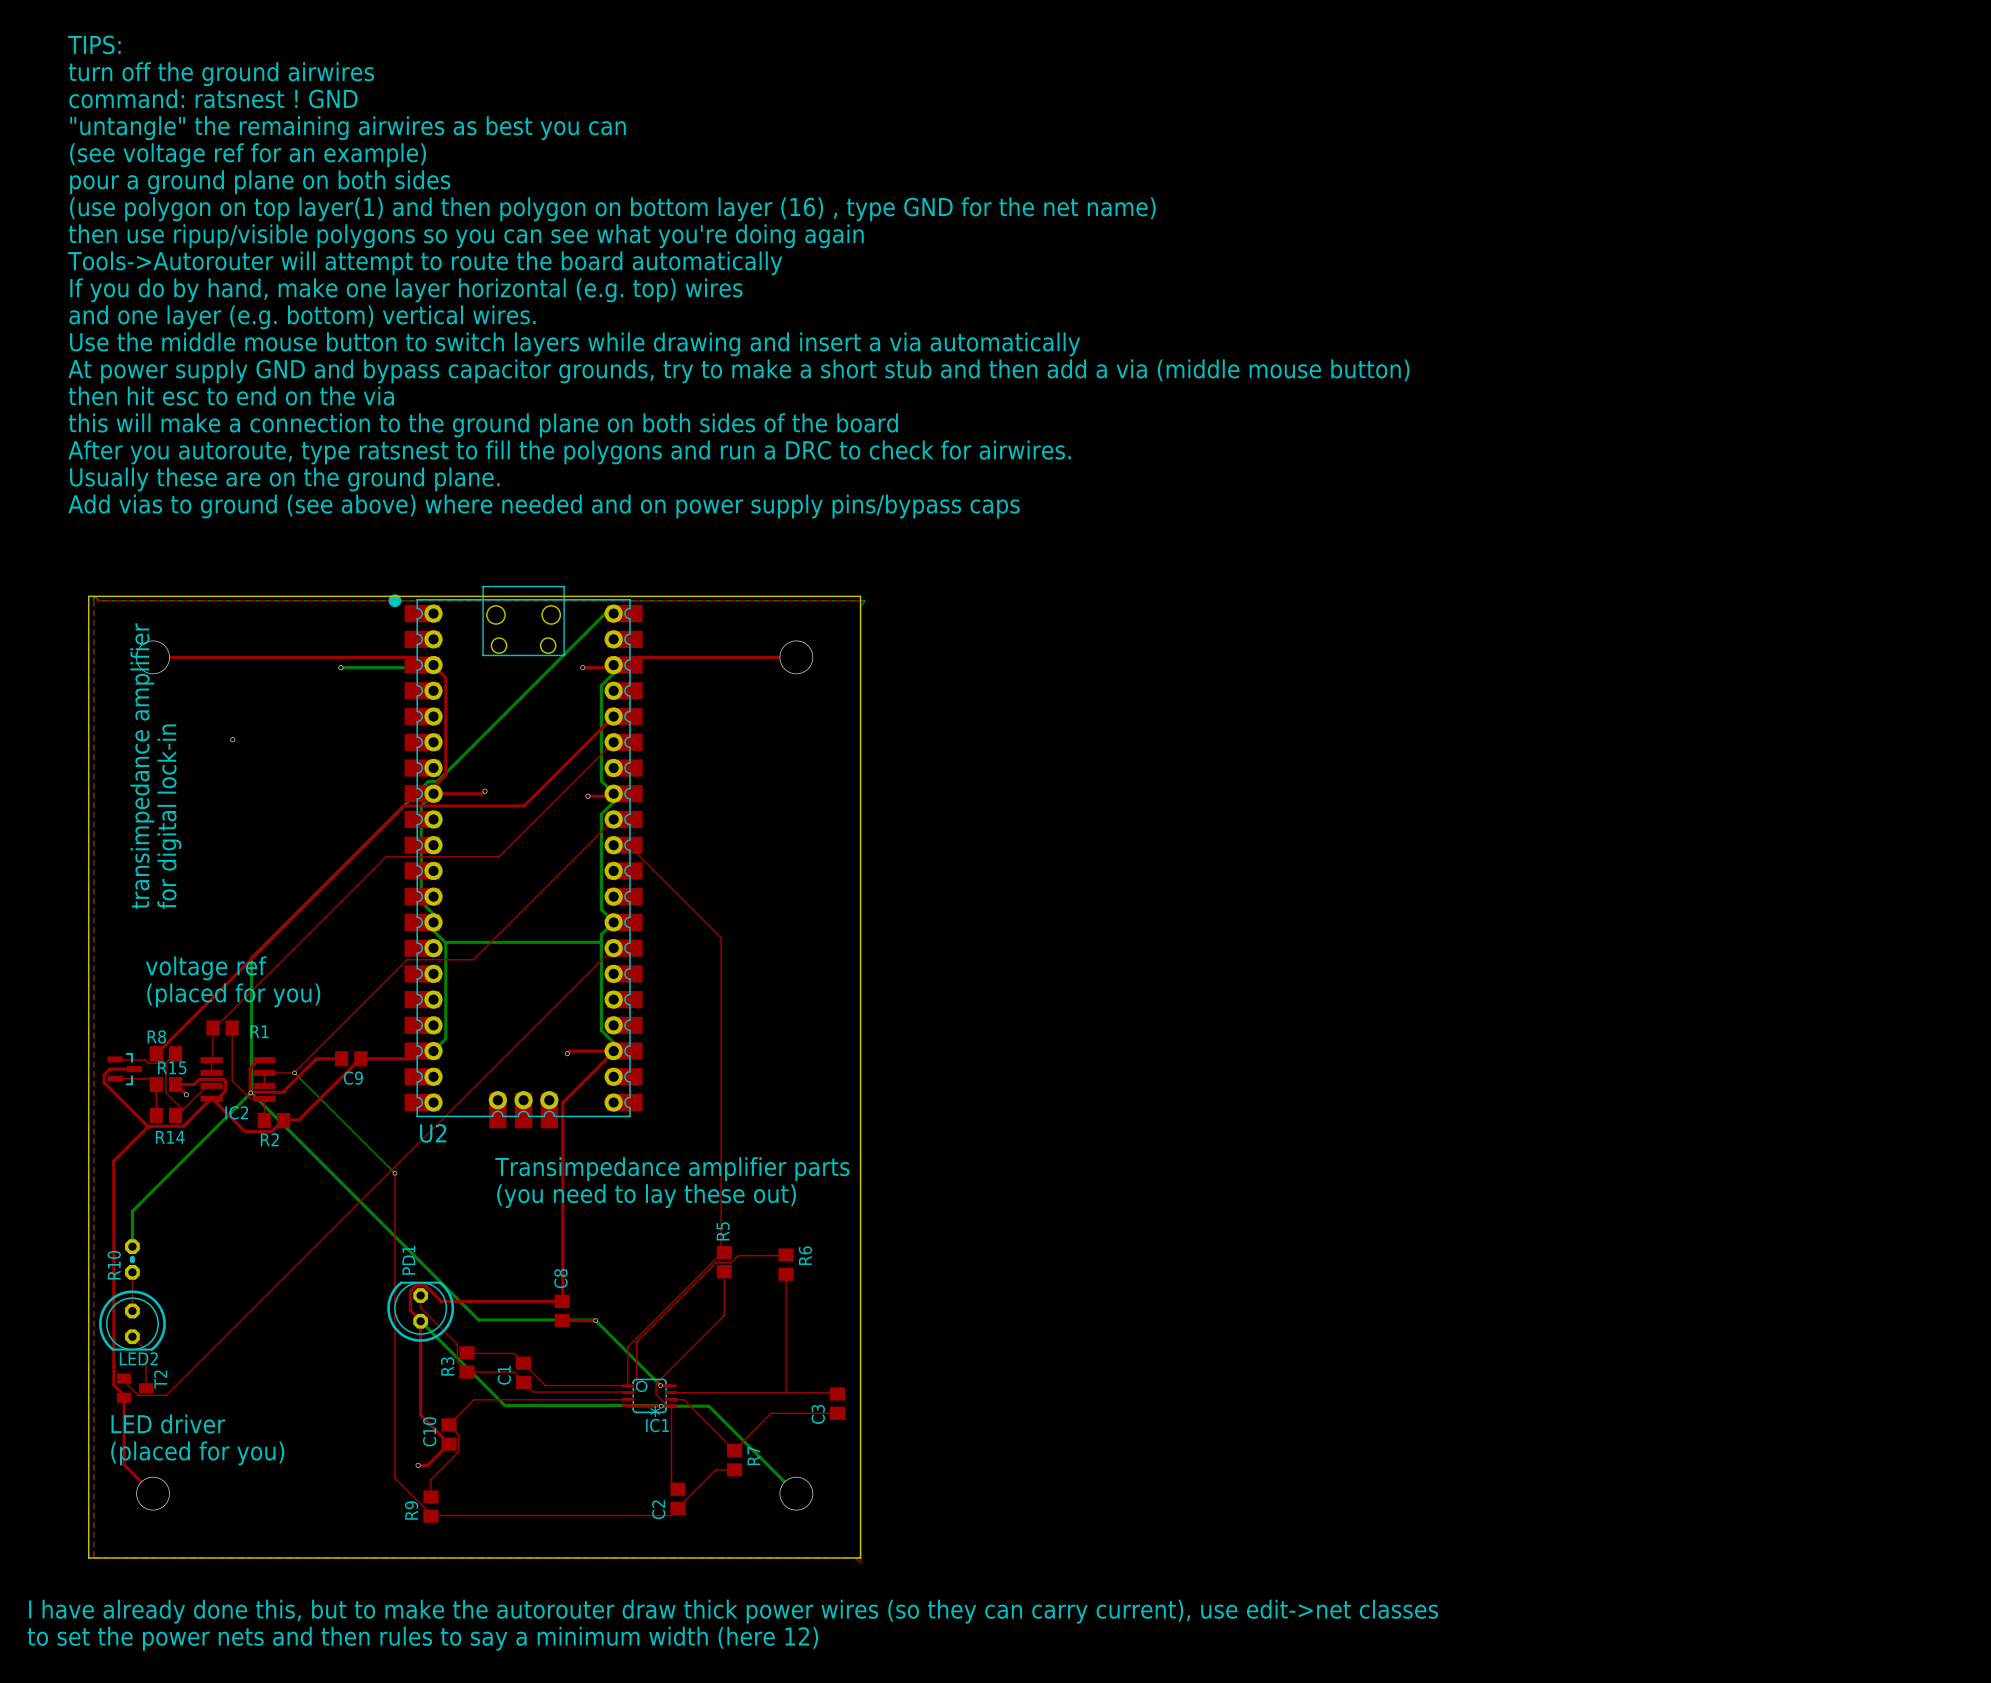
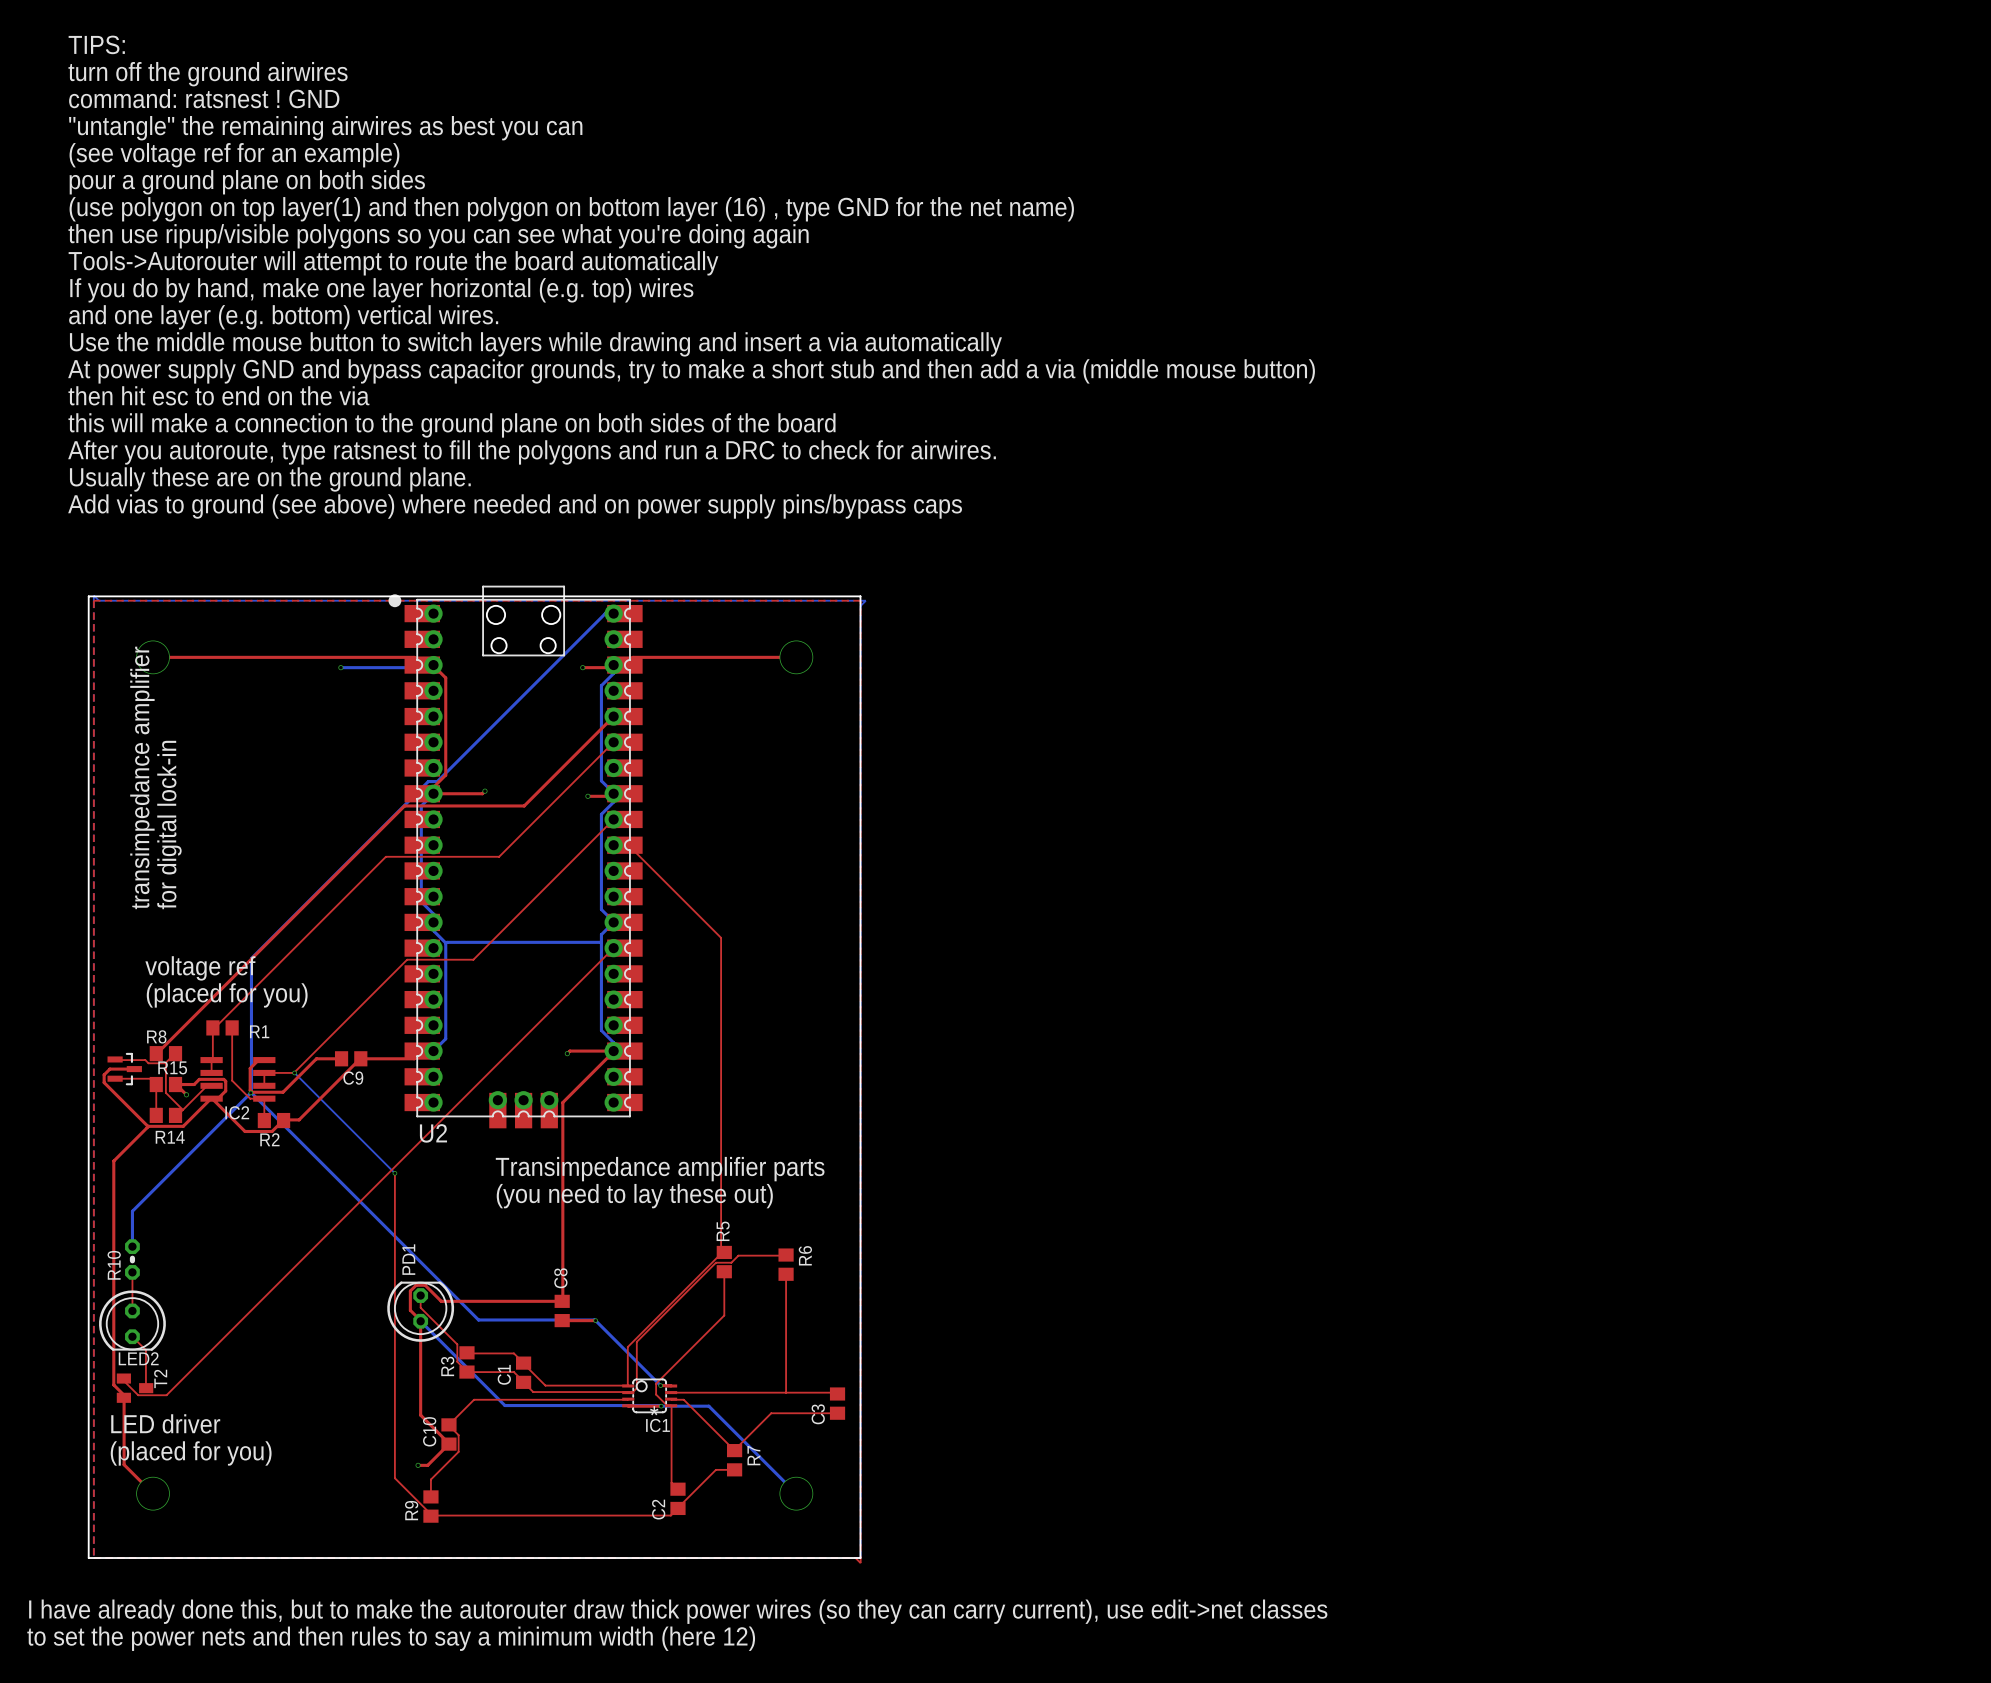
via: (232, 739) -> none

